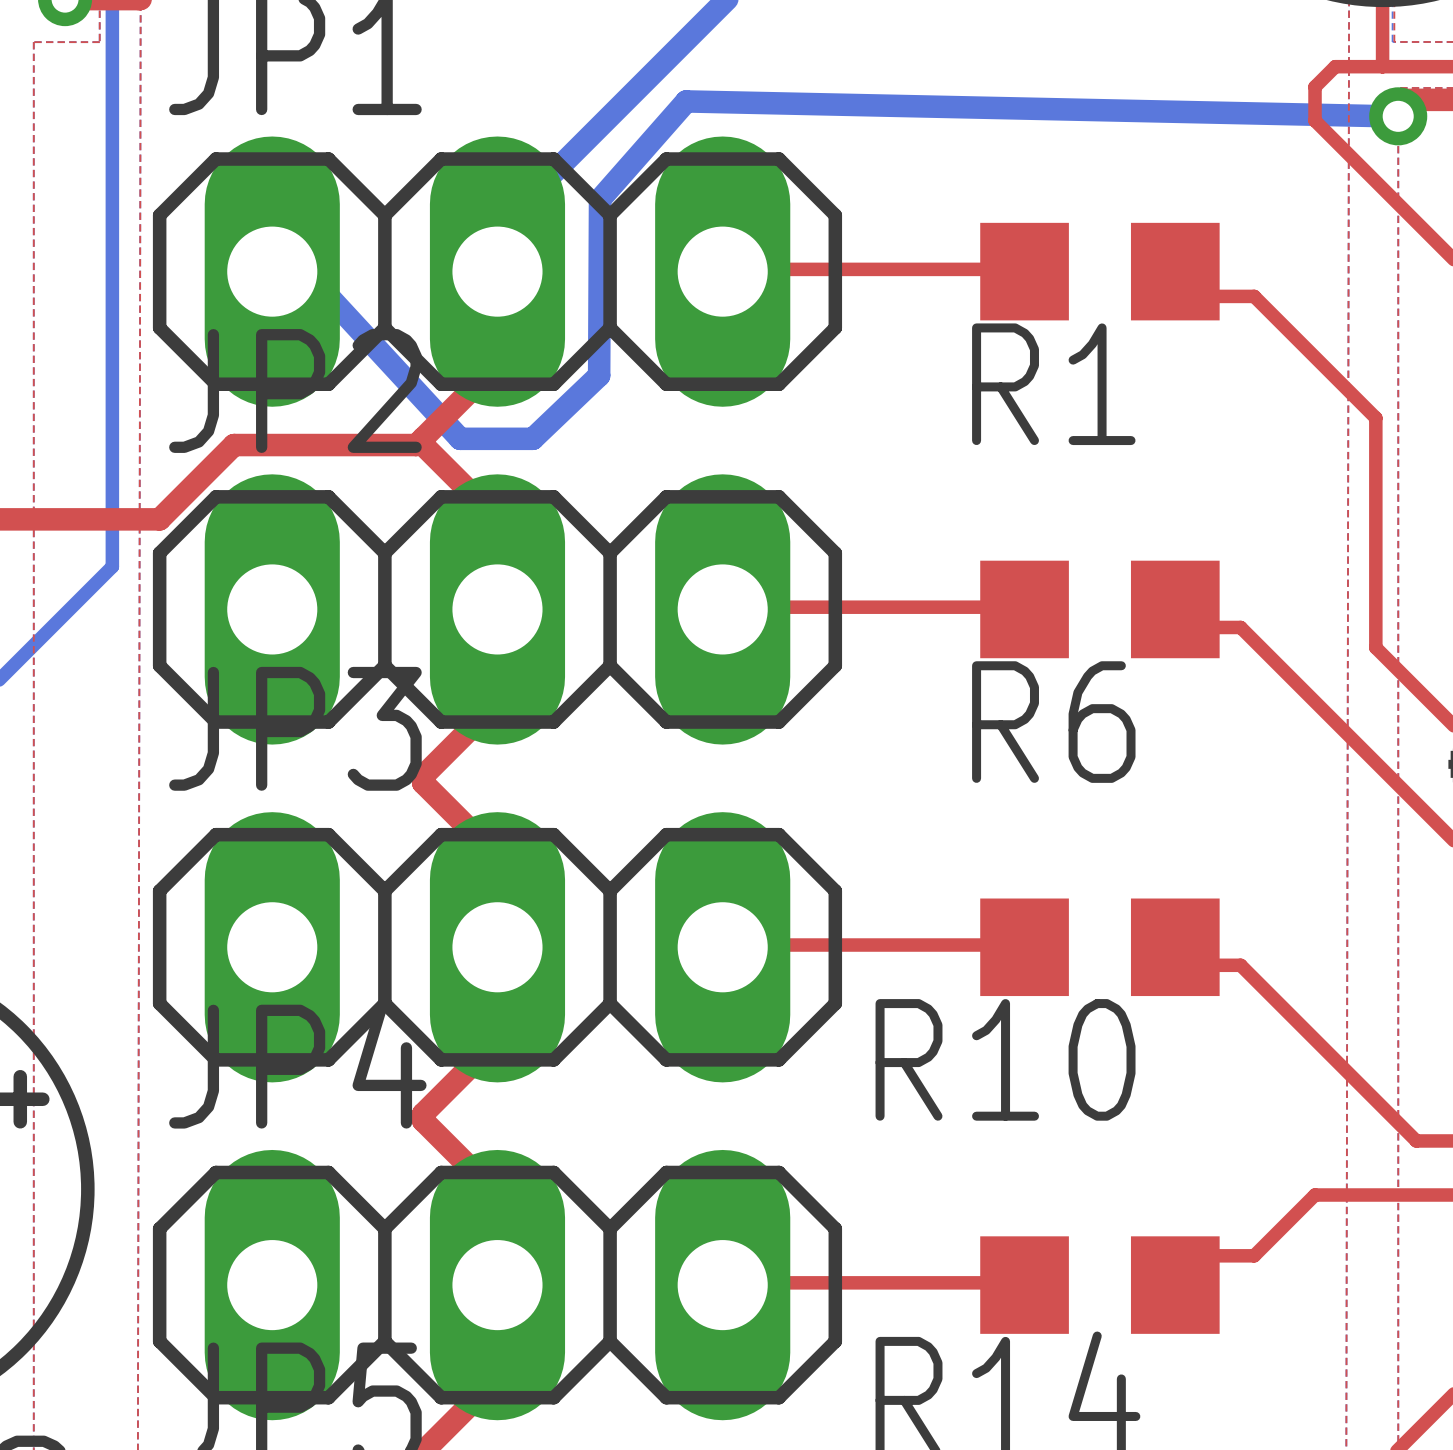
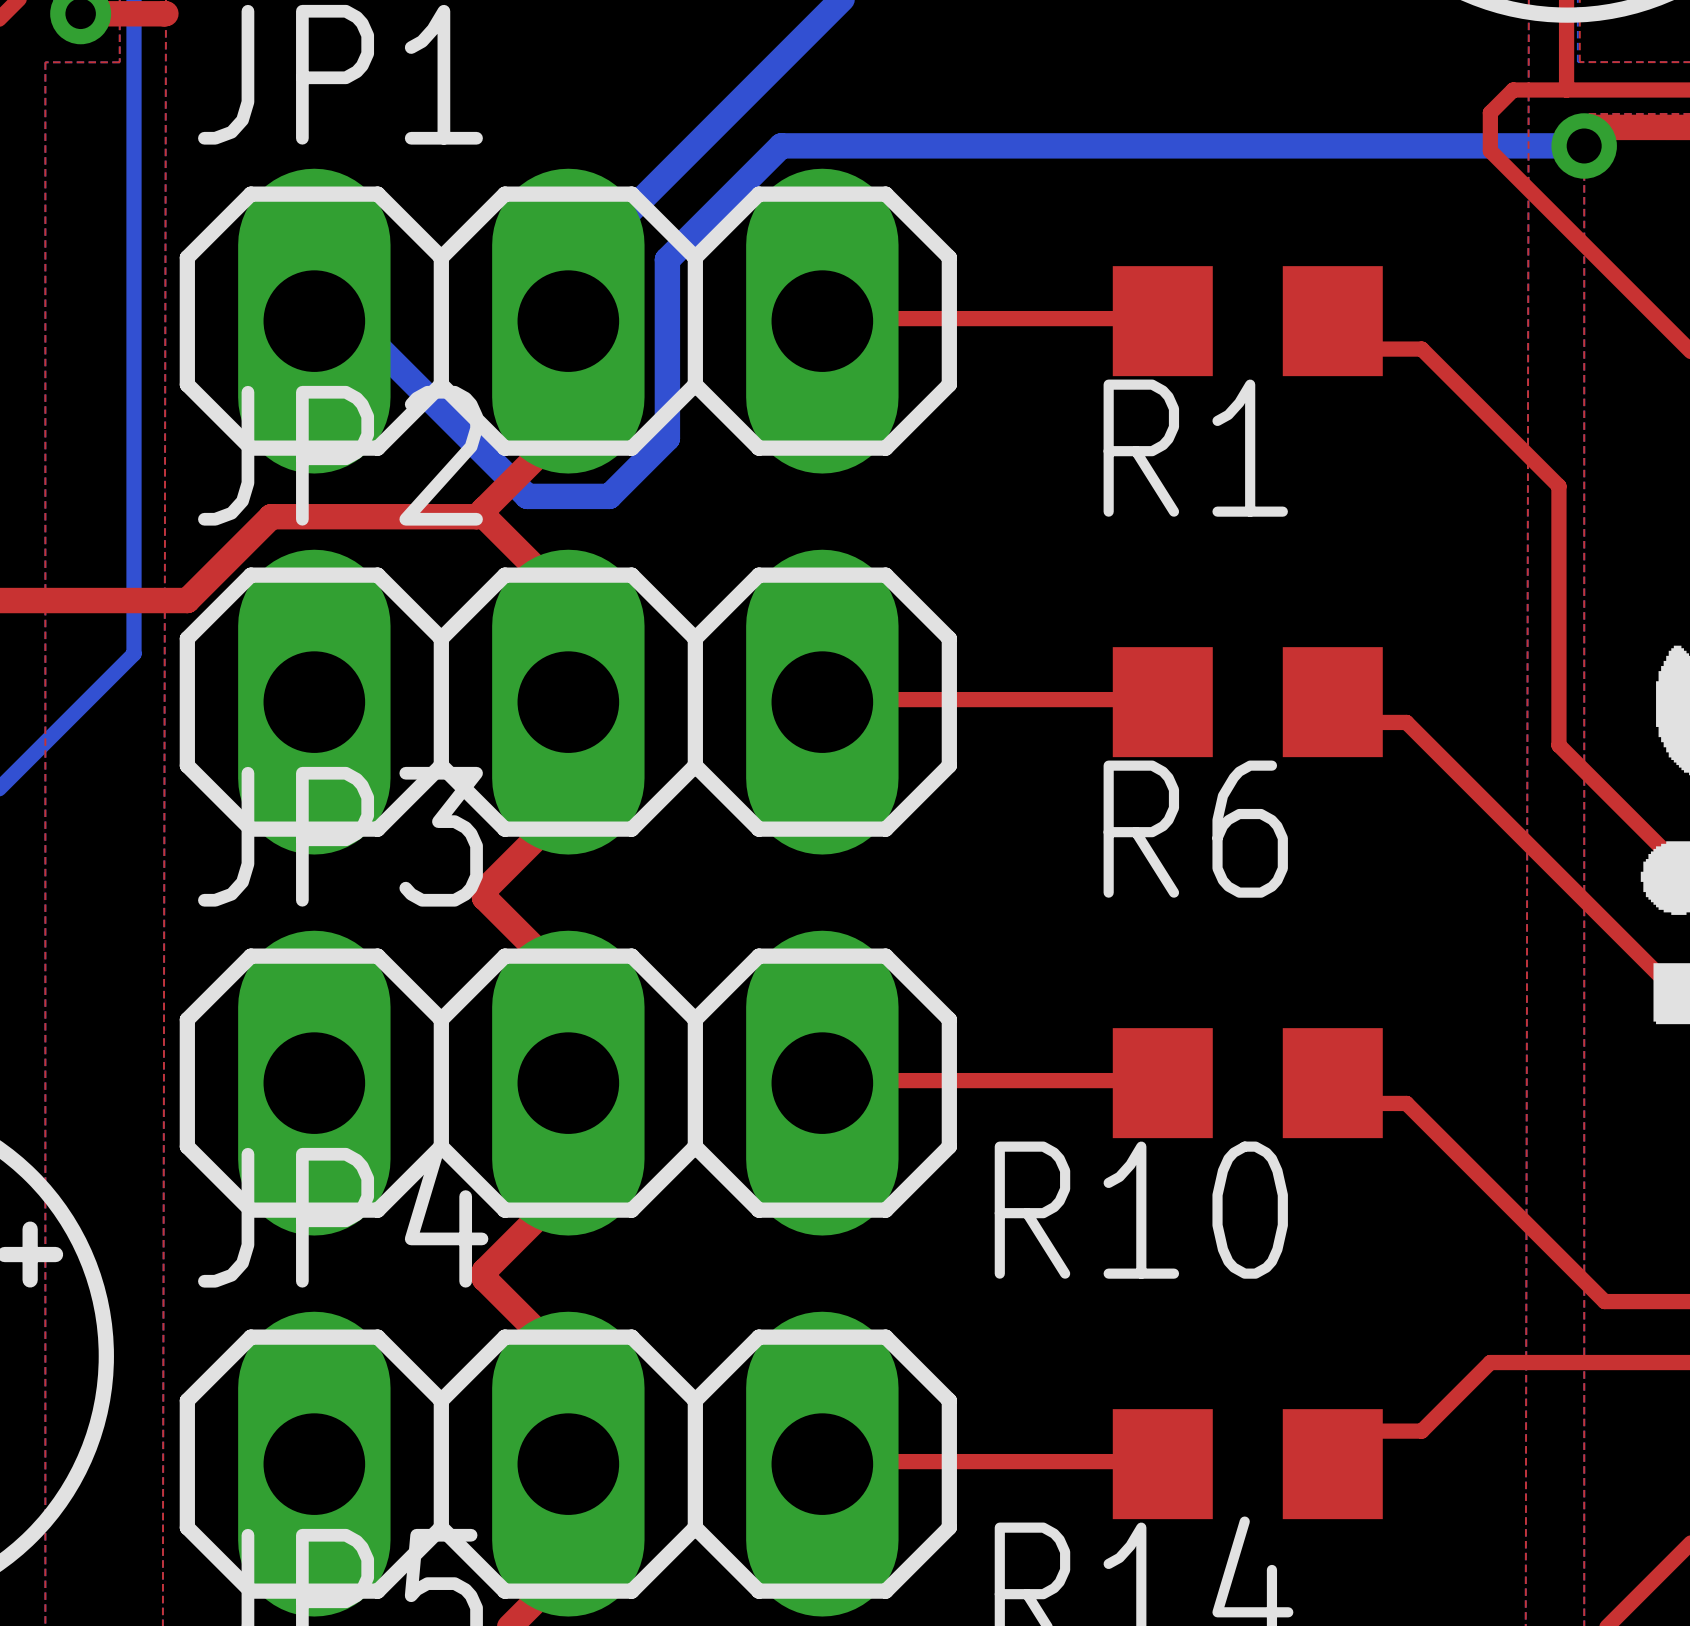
bottom track: (1385, 116) (686, 101) (600, 199) (599, 375) (532, 438) (460, 438) (305, 271) -> (1569, 145) (781, 145) (667, 259) (667, 438) (609, 496) (527, 496) (352, 321)

